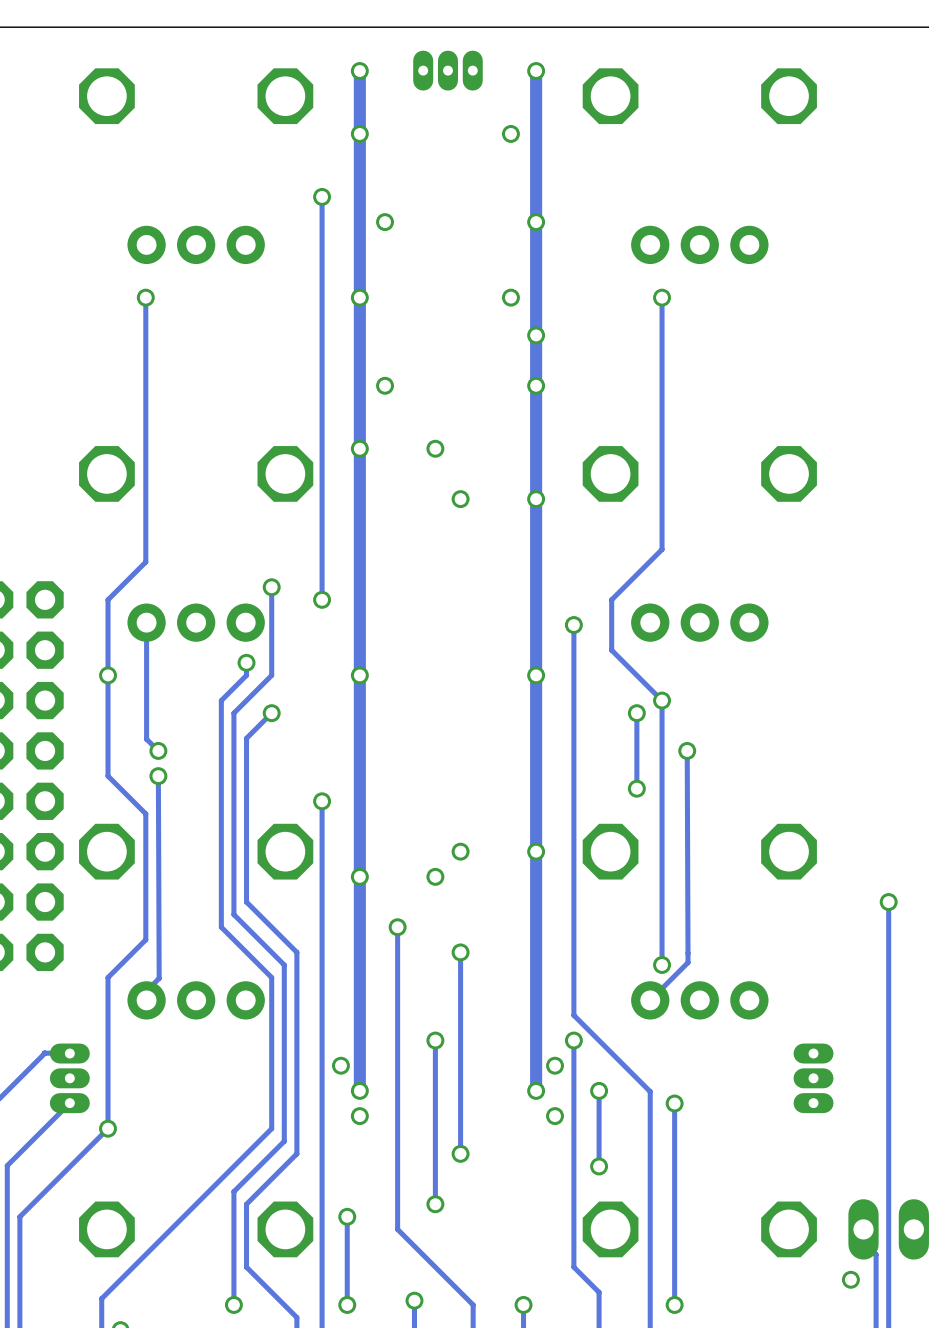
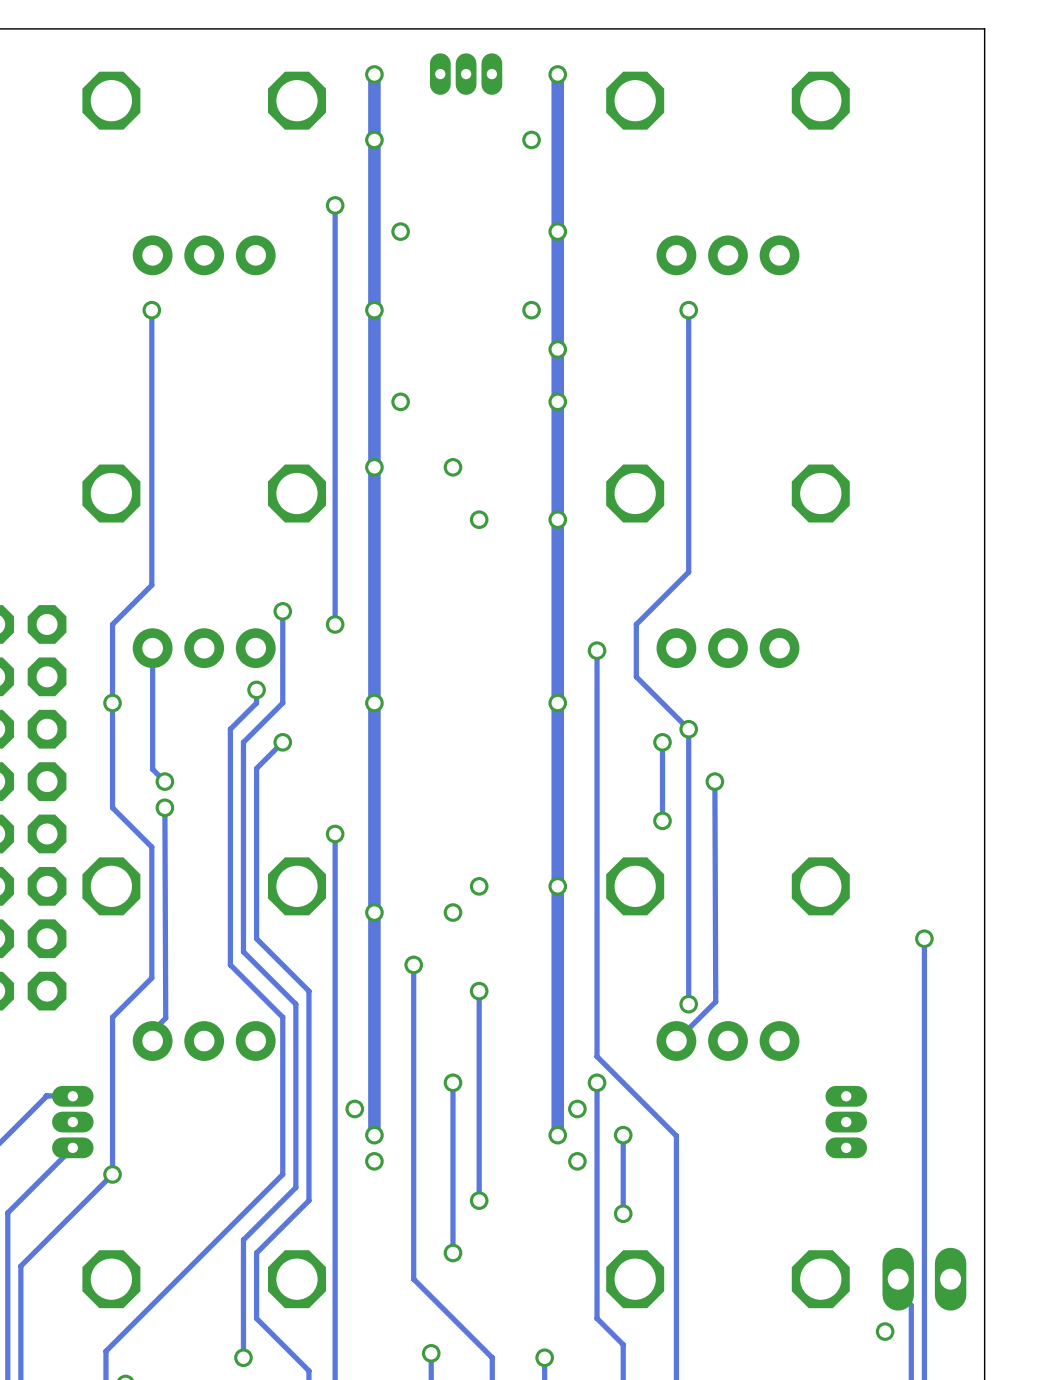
track: (674, 1103) (674, 1304) -> none
via: (674, 1103) -> none
track: (347, 1216) (347, 1304) -> none
via: (347, 1216) -> none
via: (347, 1304) -> none
via: (674, 1304) -> none

